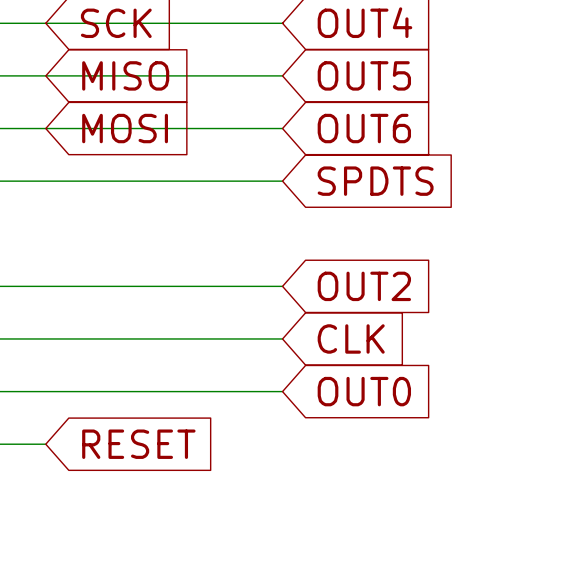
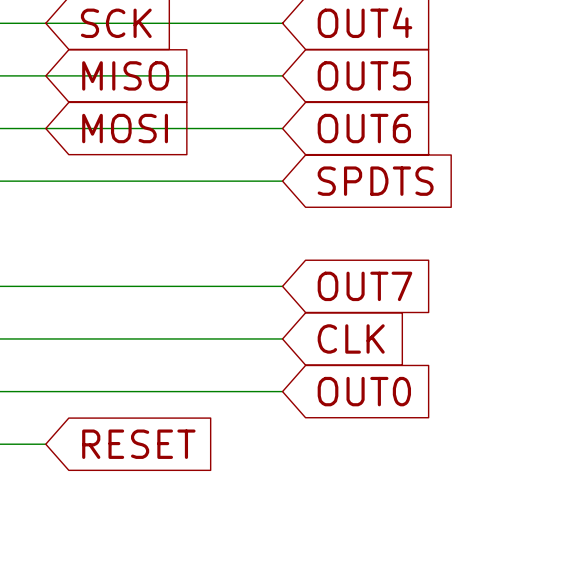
global label: OUT2 (364, 286) -> OUT7 (364, 286)

